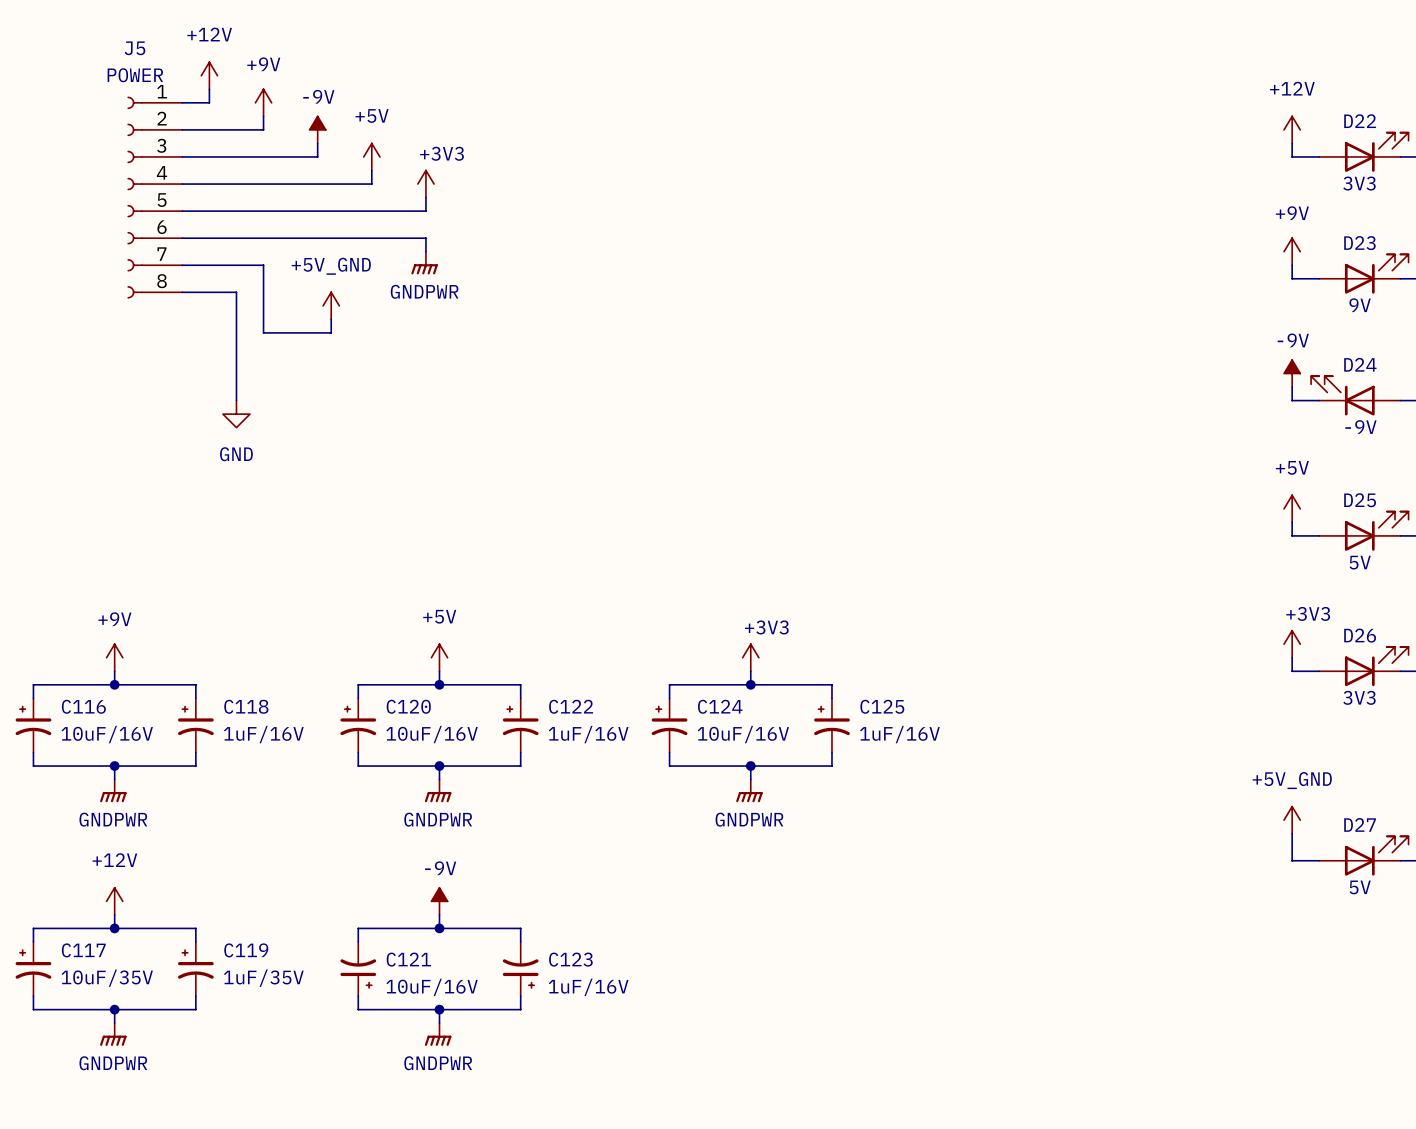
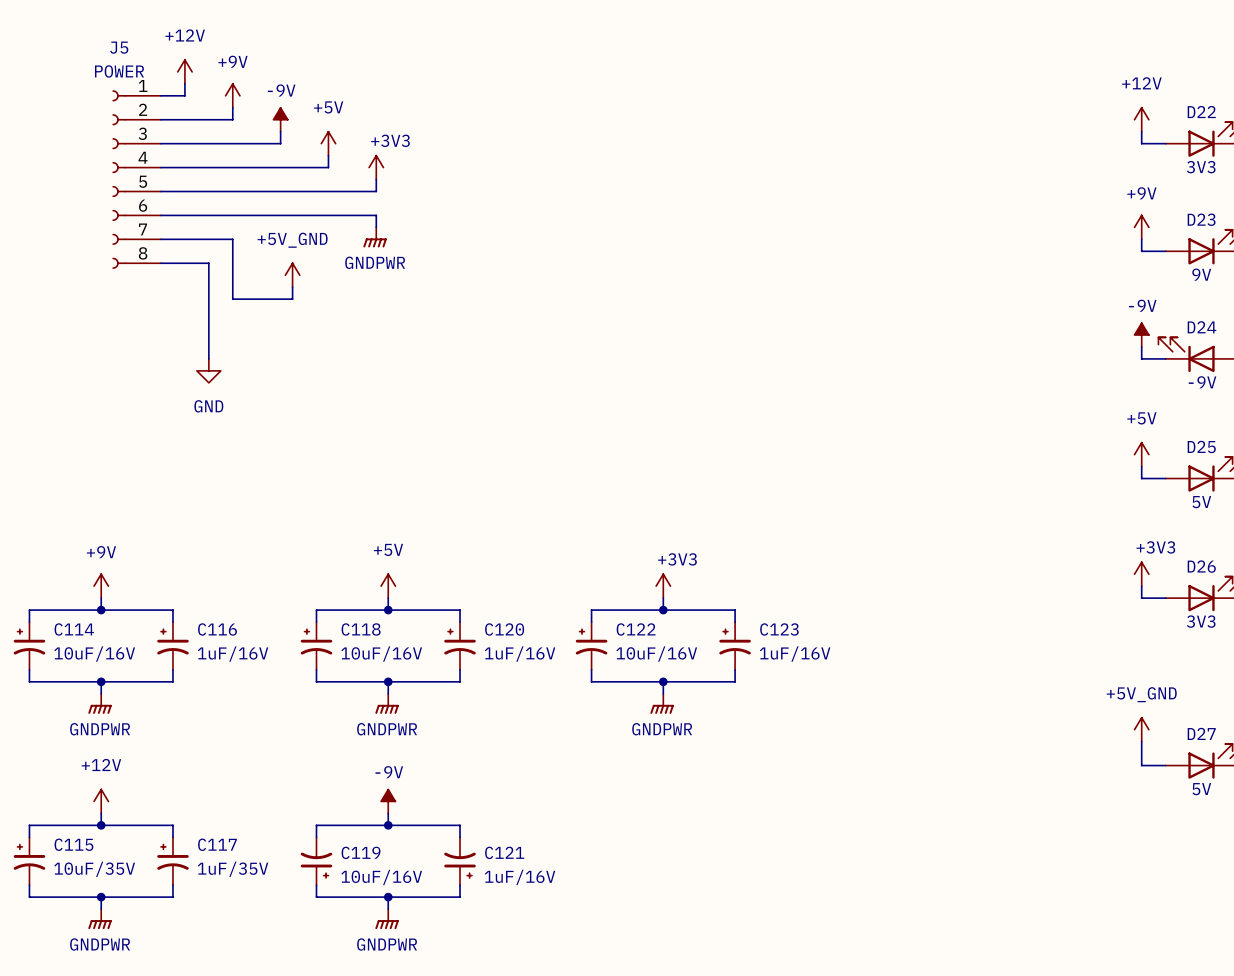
C116 name: C116 (83, 706) -> C114 (74, 629)
C118 name: C118 (246, 706) -> C116 (217, 629)
C120 name: C120 (408, 706) -> C118 (361, 629)
C122 name: C122 (571, 706) -> C120 (504, 629)
C124 name: C124 (720, 706) -> C122 (636, 629)
C125 name: C125 (882, 706) -> C123 (779, 629)
C117 name: C117 (83, 950) -> C115 (73, 844)
C119 name: C119 (246, 950) -> C117 (217, 844)
C121 name: C121 (408, 959) -> C119 (361, 852)
C123 name: C123 (570, 959) -> C121 (504, 852)

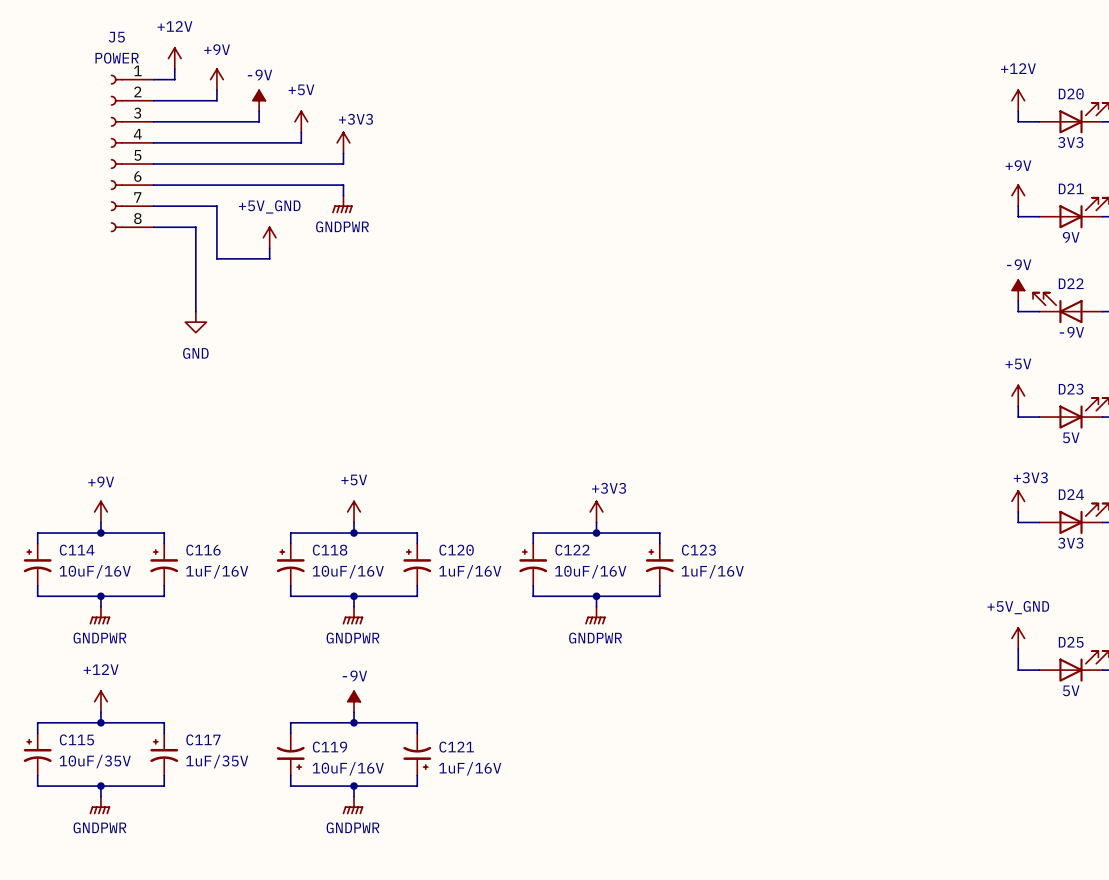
D22 name: D22 (1201, 112) -> D20 (1071, 94)
D23 name: D23 (1201, 219) -> D21 (1071, 188)
D24 name: D24 (1201, 327) -> D22 (1071, 283)
D25 name: D25 (1201, 446) -> D23 (1071, 389)
D26 name: D26 (1201, 566) -> D24 (1071, 494)
D27 name: D27 (1201, 733) -> D25 (1071, 642)

